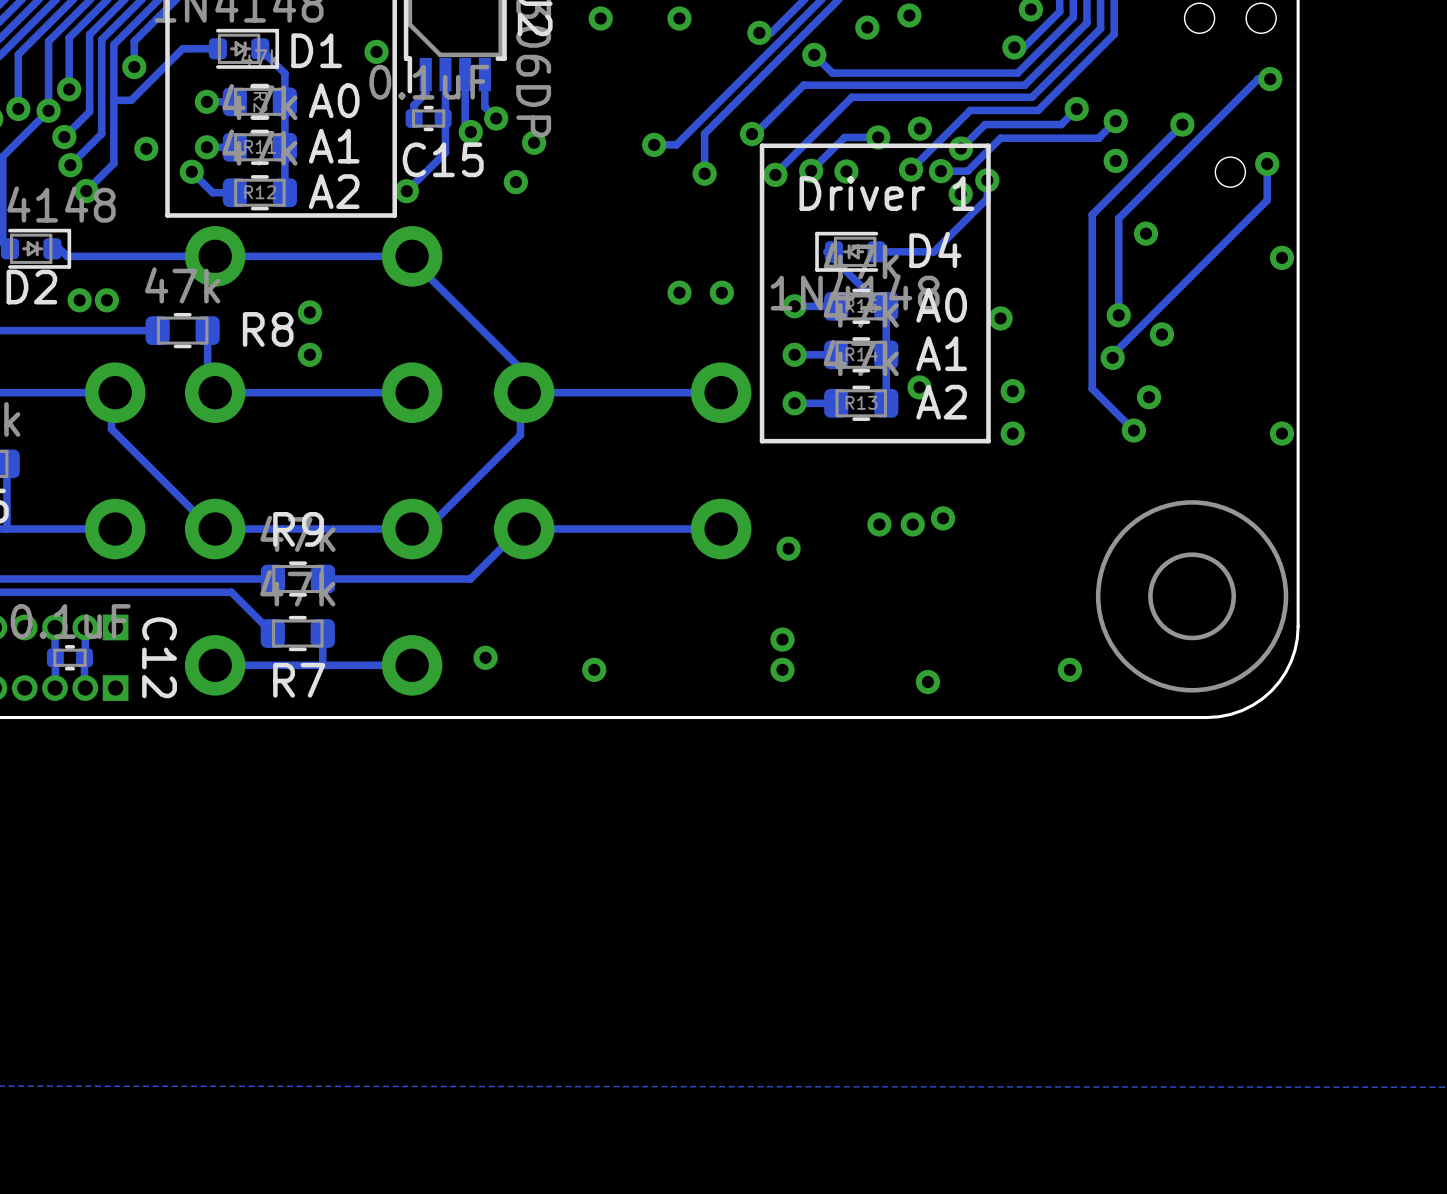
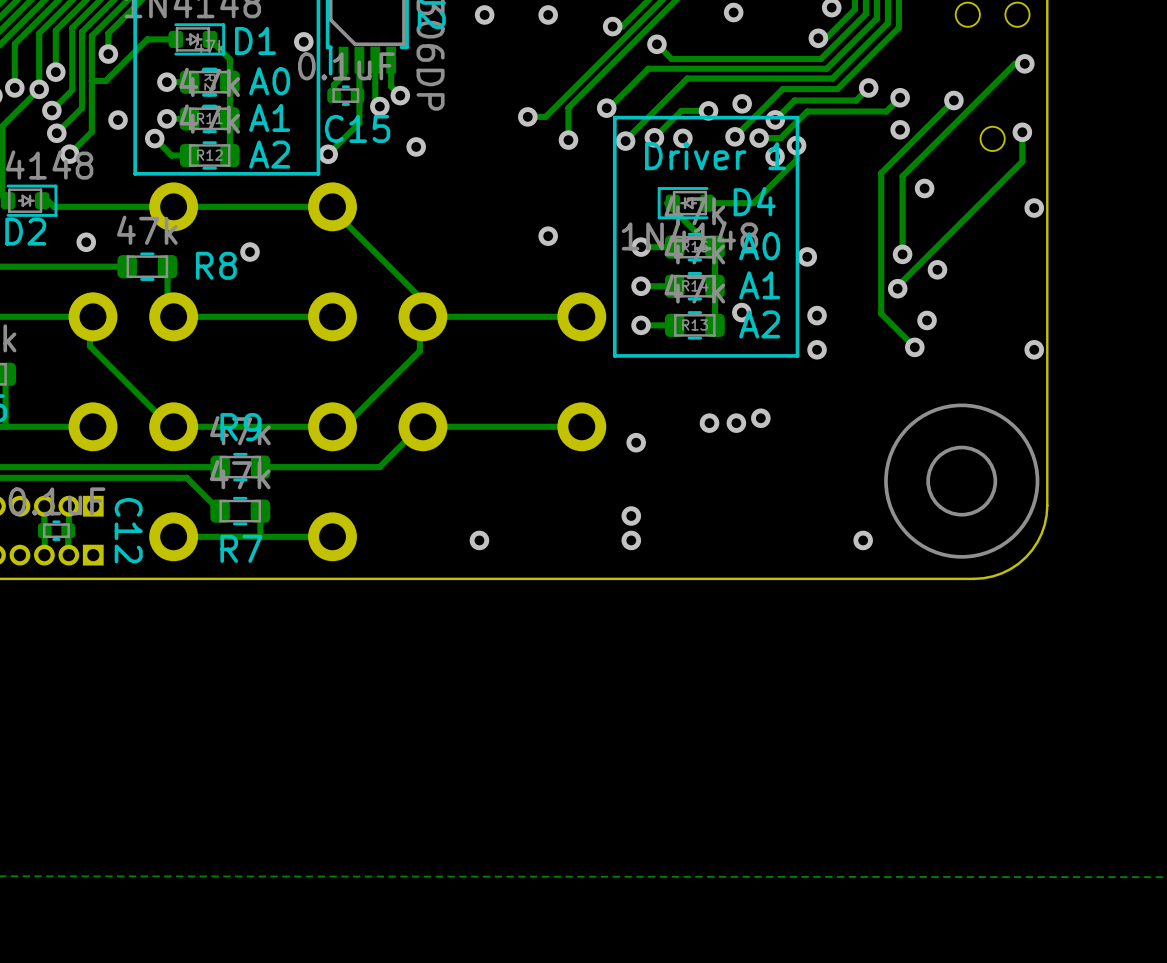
via: (867, 27) -> none
via: (534, 142) -> none
via: (721, 292) -> none
via: (79, 300) -> none
via: (309, 354) -> none
via: (485, 657) -> none
via: (927, 682) -> none

